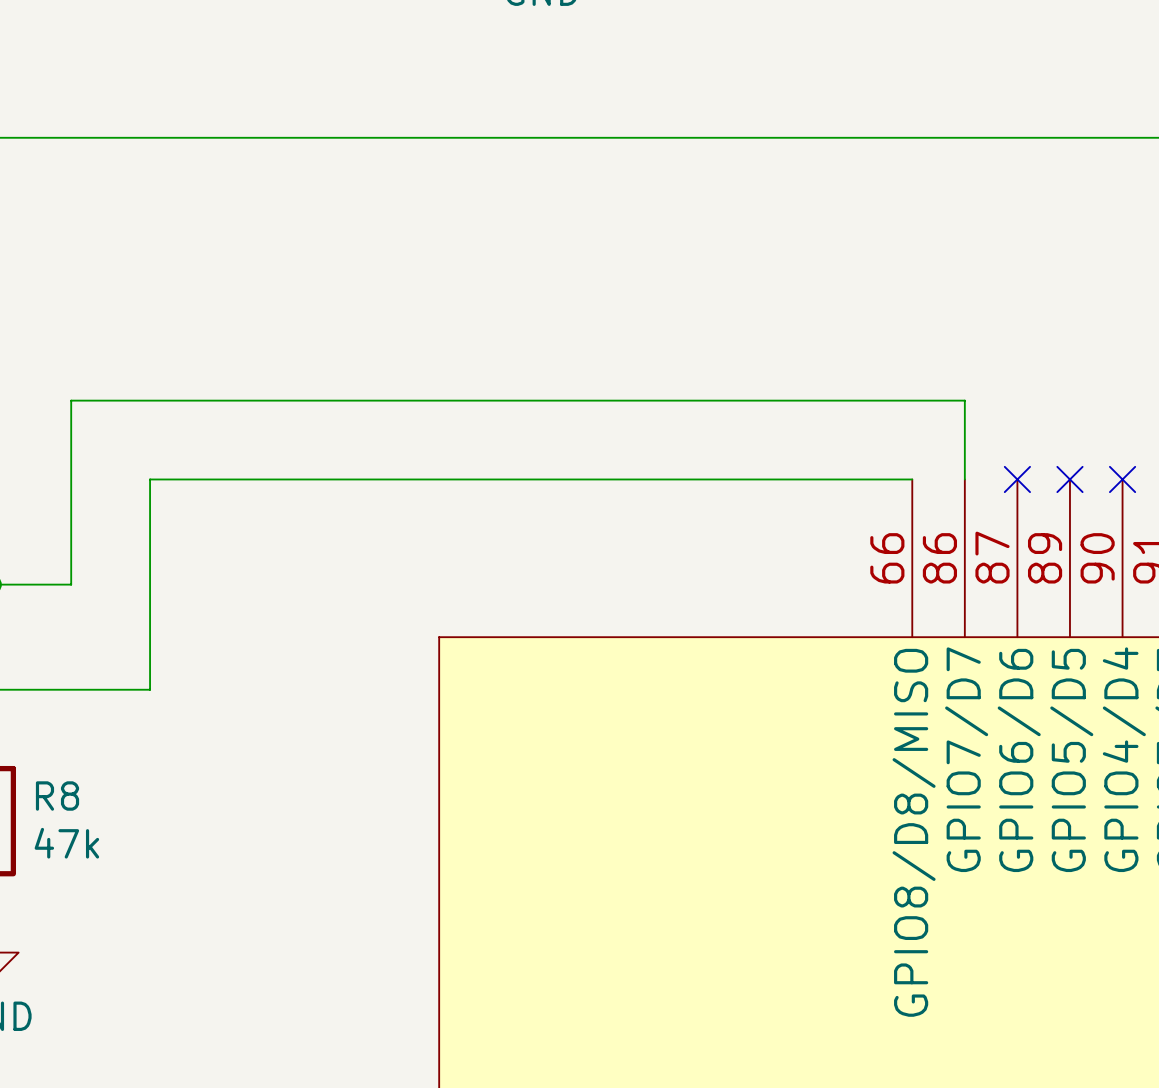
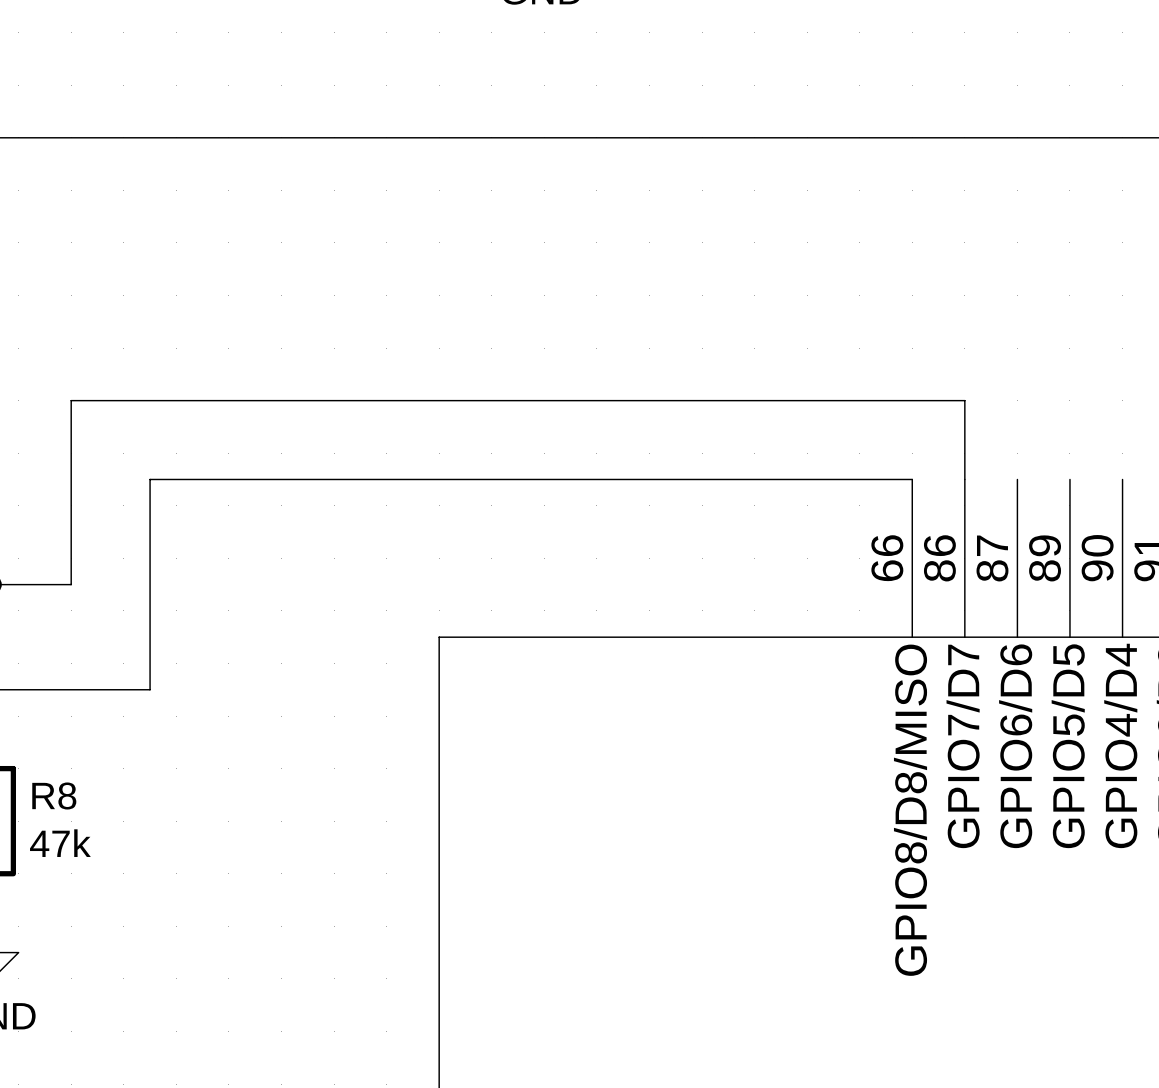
no-connect mark: (1017, 479) -> none
no-connect mark: (1069, 479) -> none
no-connect mark: (1122, 479) -> none

